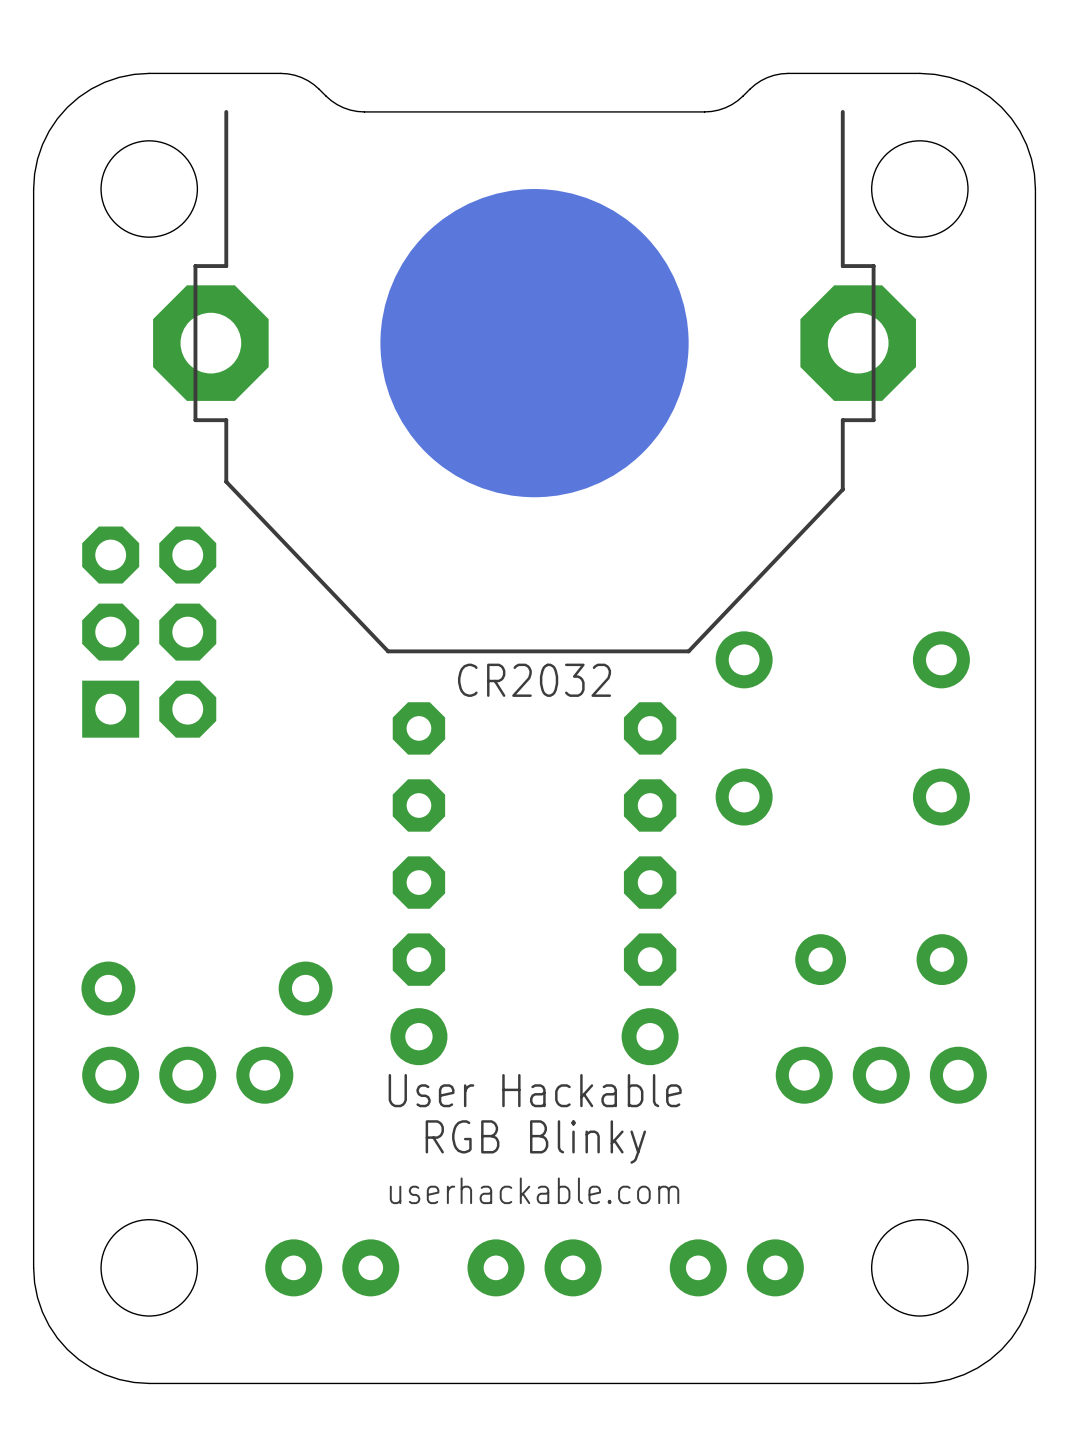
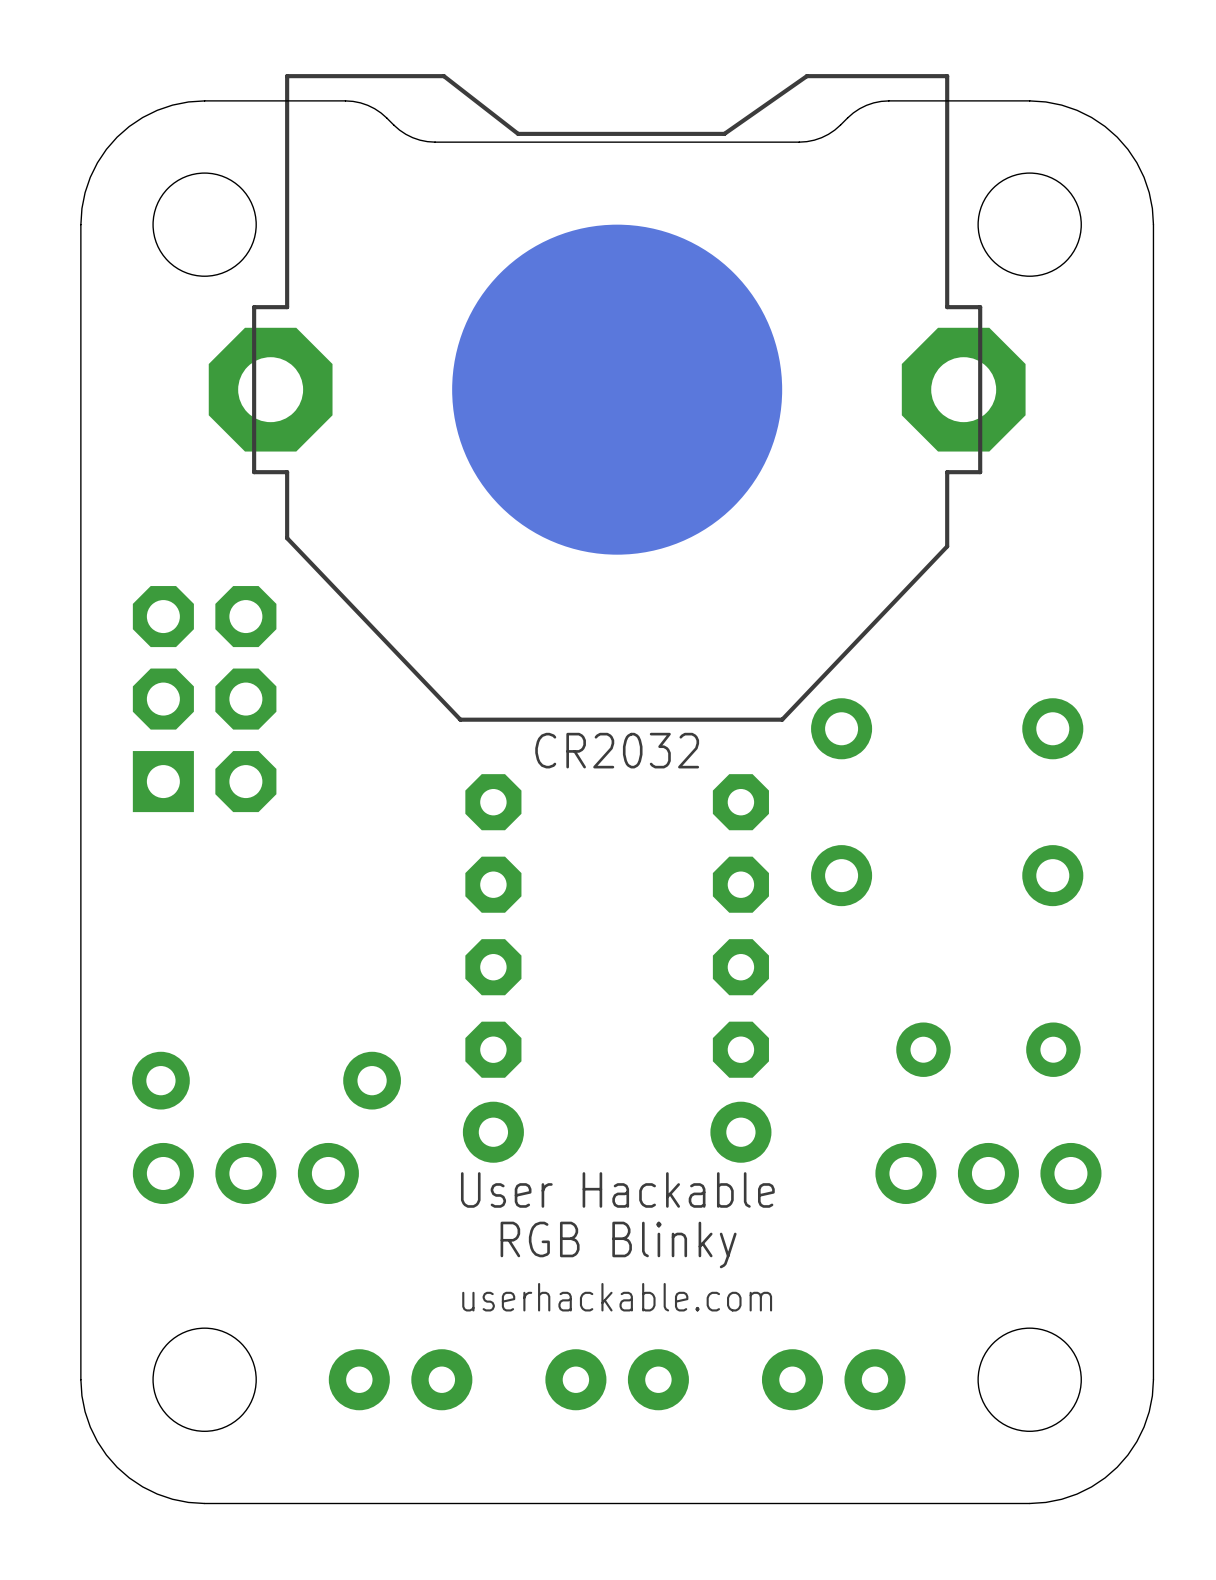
part: none -> (617, 397)
part: (534, 381) -> none

